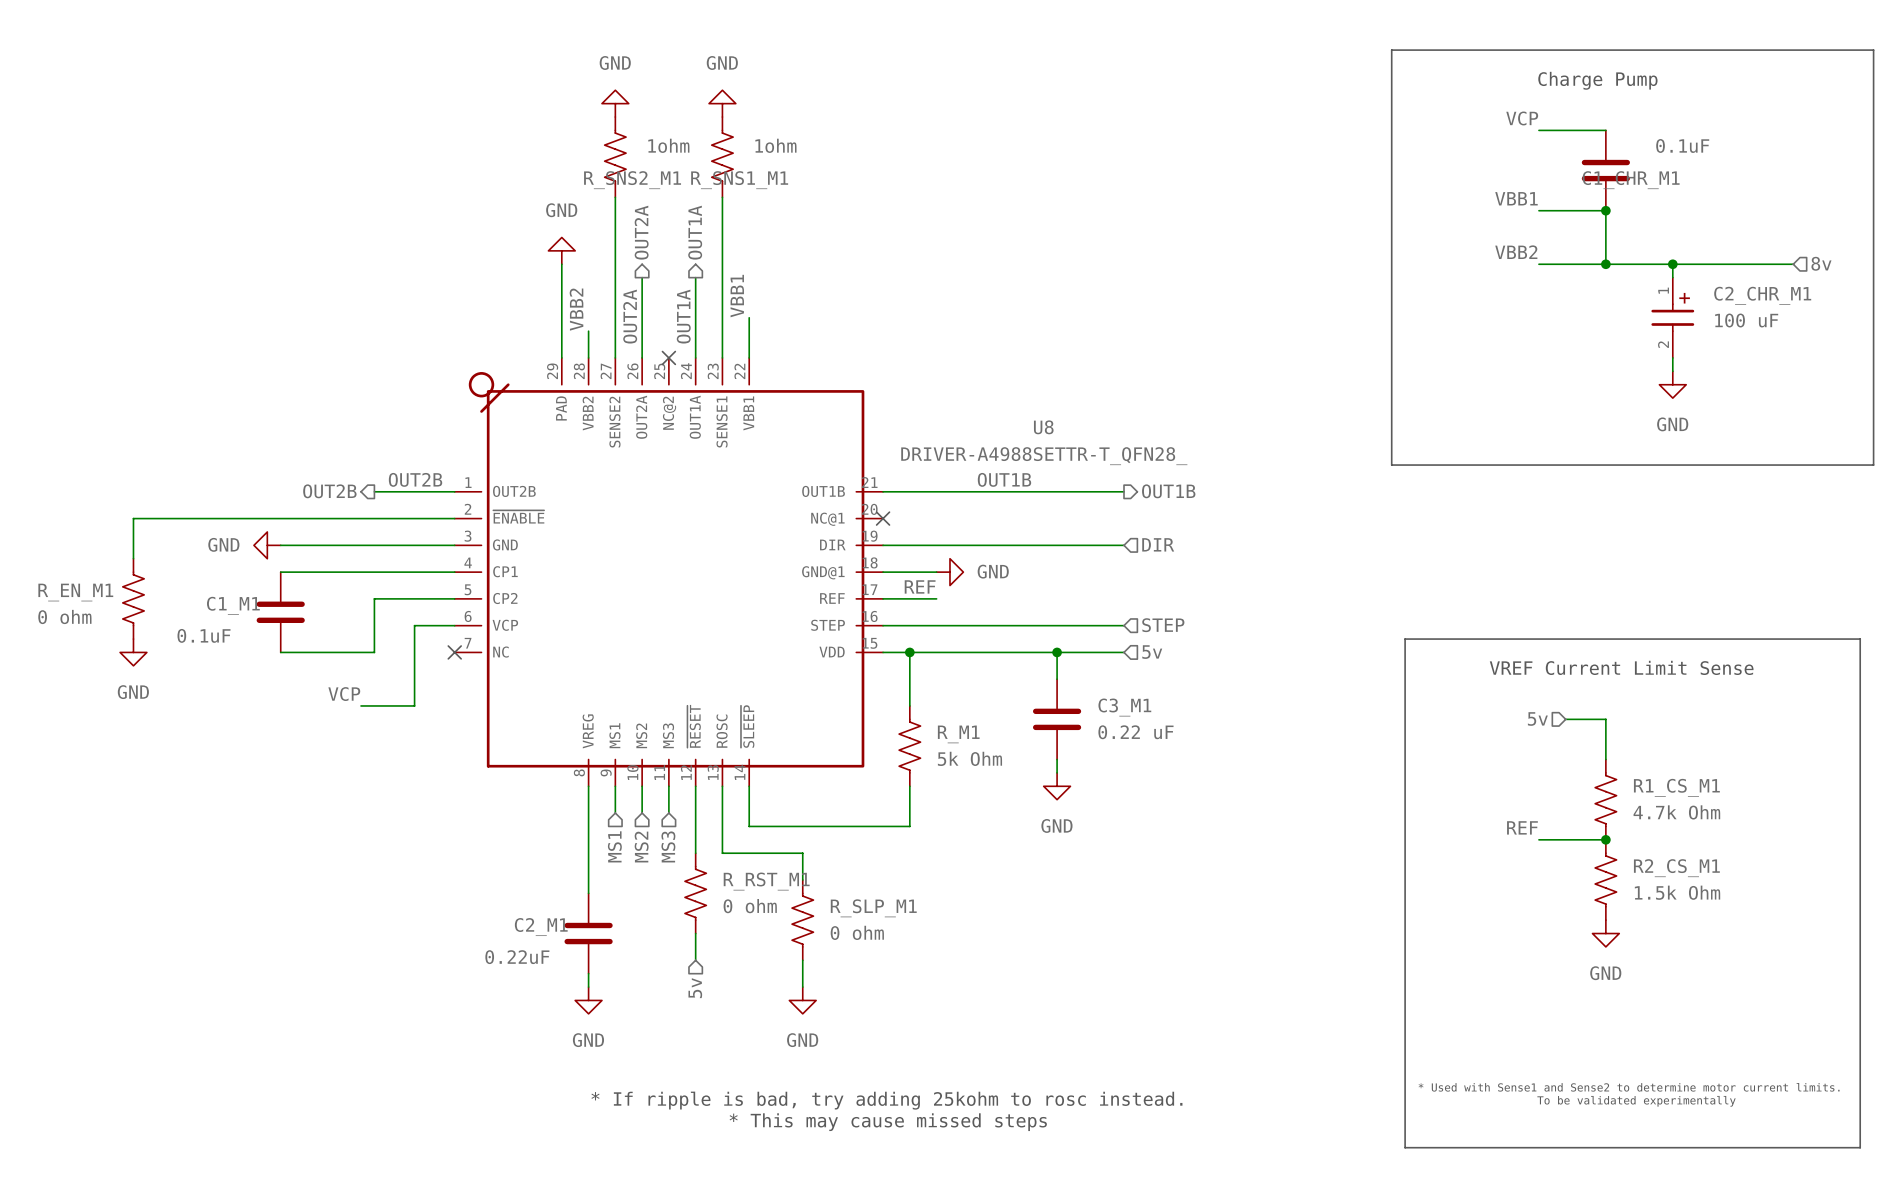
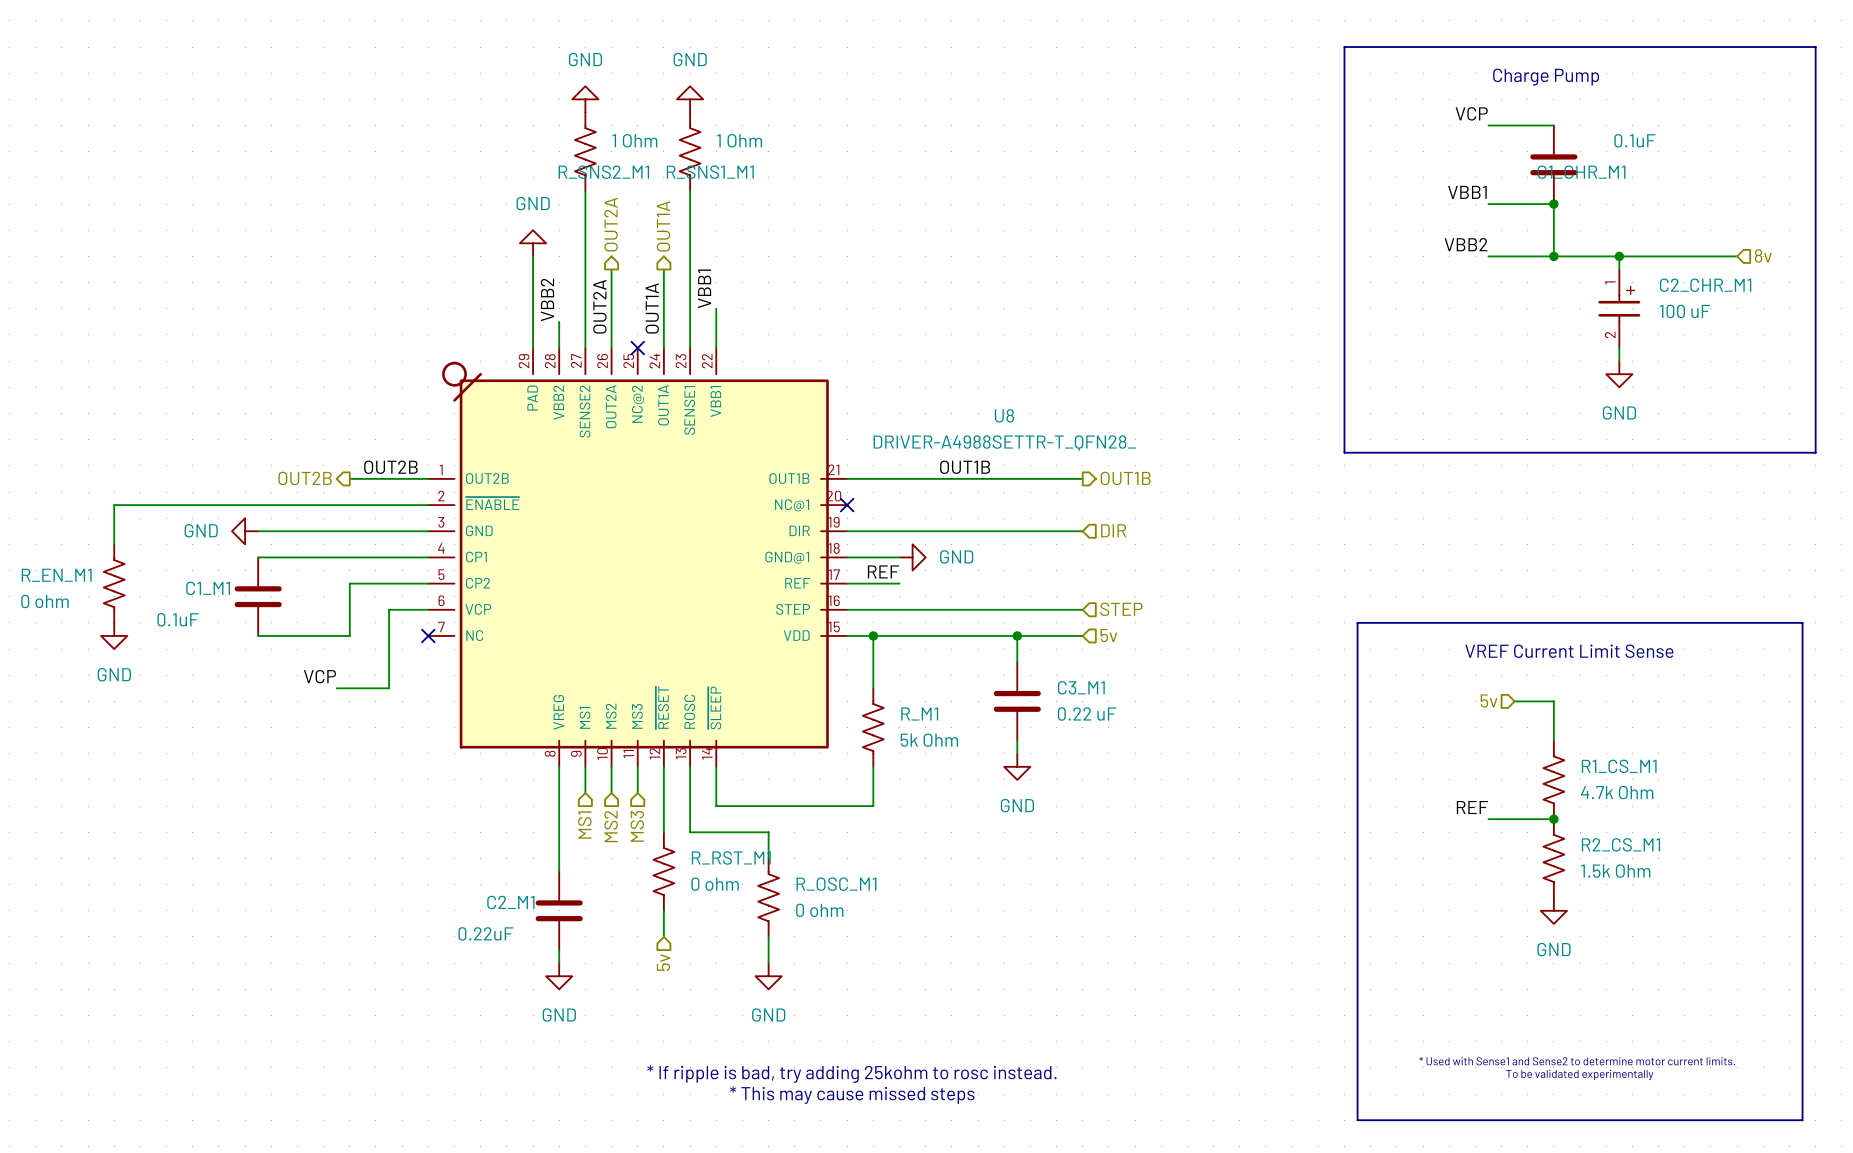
R_SNS2_M1 value: 1ohm (668, 145) -> 1 Ohm (634, 140)
R_SNS1_M1 value: 1ohm (775, 145) -> 1 Ohm (739, 140)
R_SLP_M1 name: R_SLP_M1 (873, 908) -> R_OSC_M1 (836, 884)

